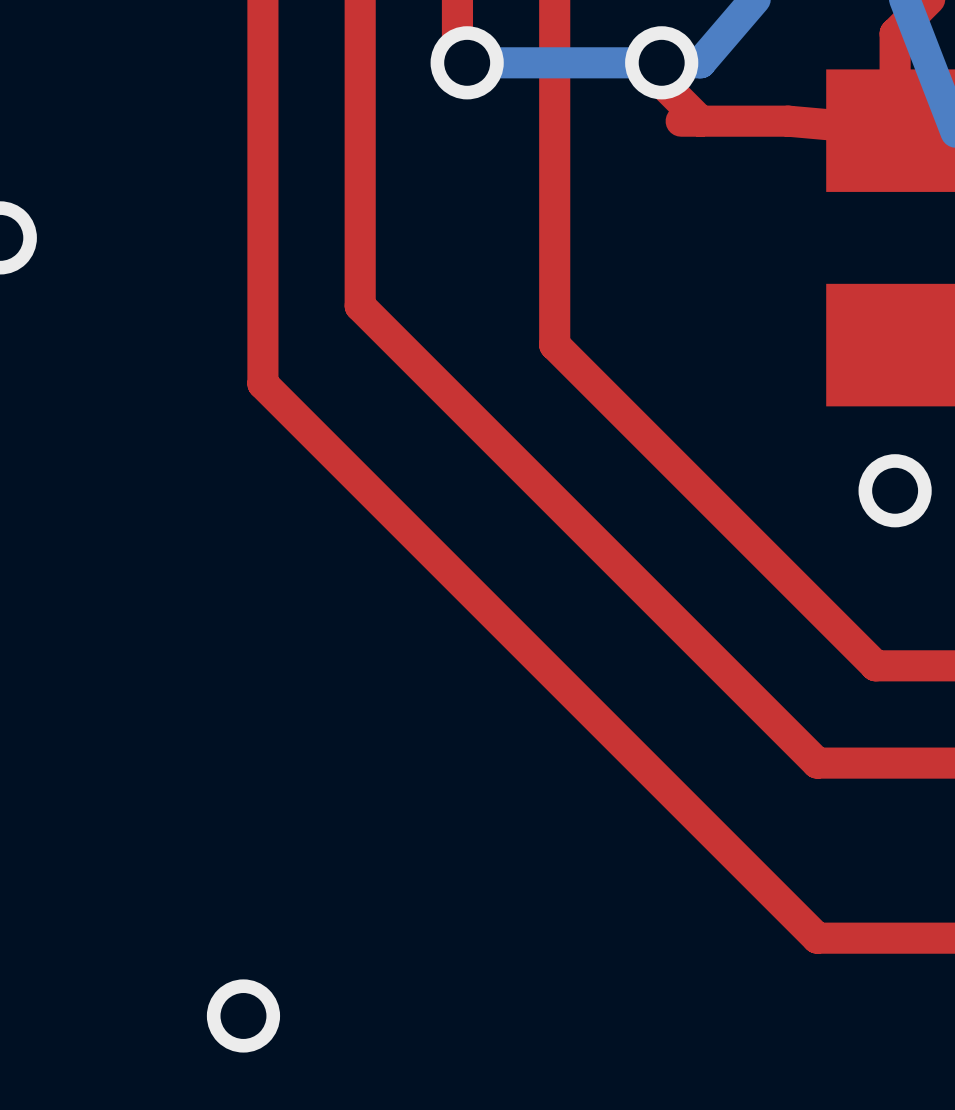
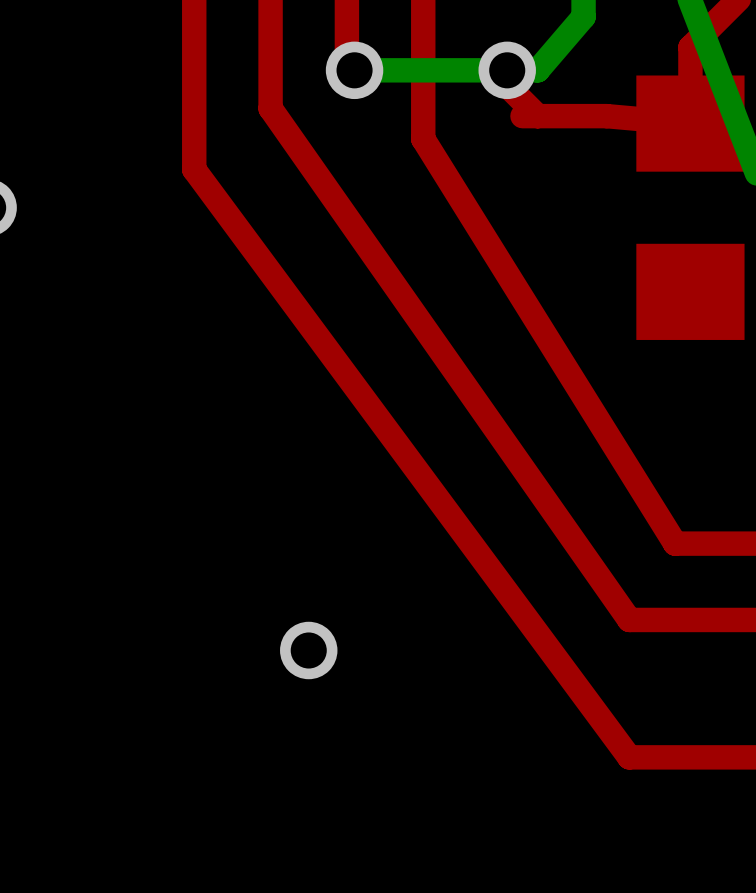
top track: (360, 111) (360, 305) (817, 763) -> (270, 108) (629, 619)
top track: (554, 150) (554, 344) (875, 665) -> (423, 139) (675, 543)
top track: (262, 189) (262, 383) (817, 938) -> (194, 169) (629, 757)
via: (895, 490) -> none
via position: (243, 1015) -> (308, 650)

